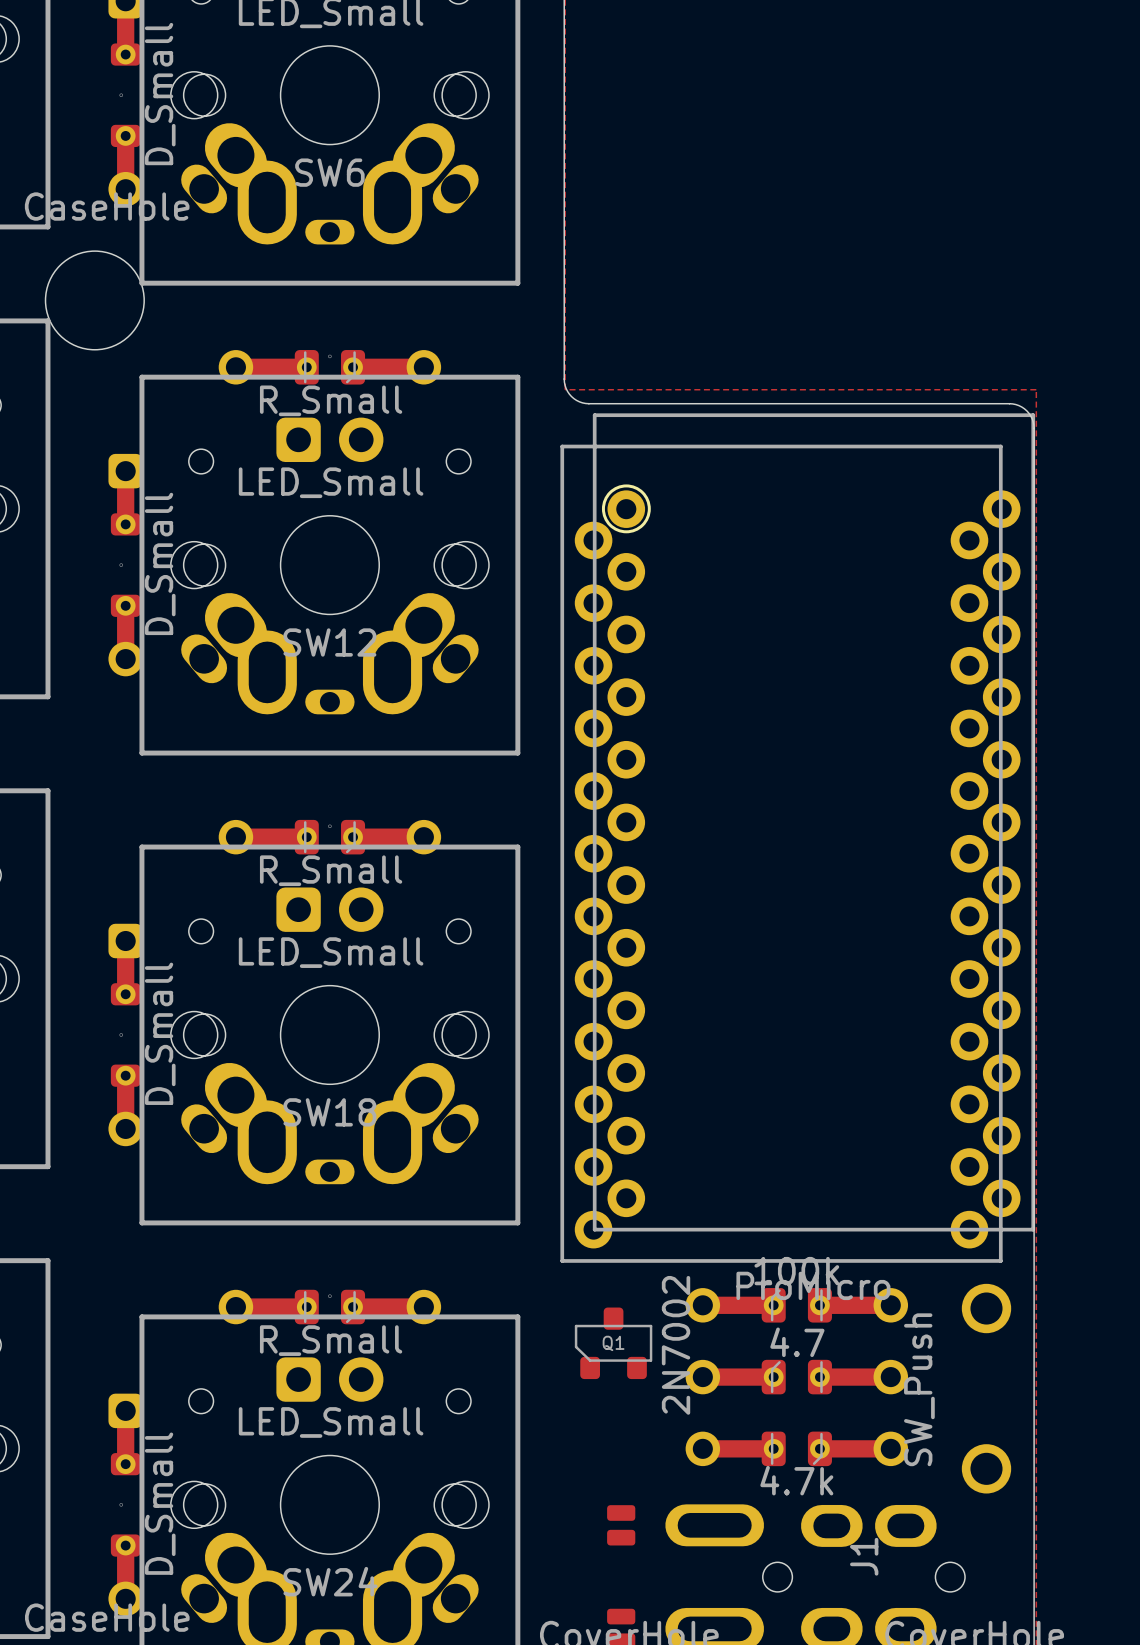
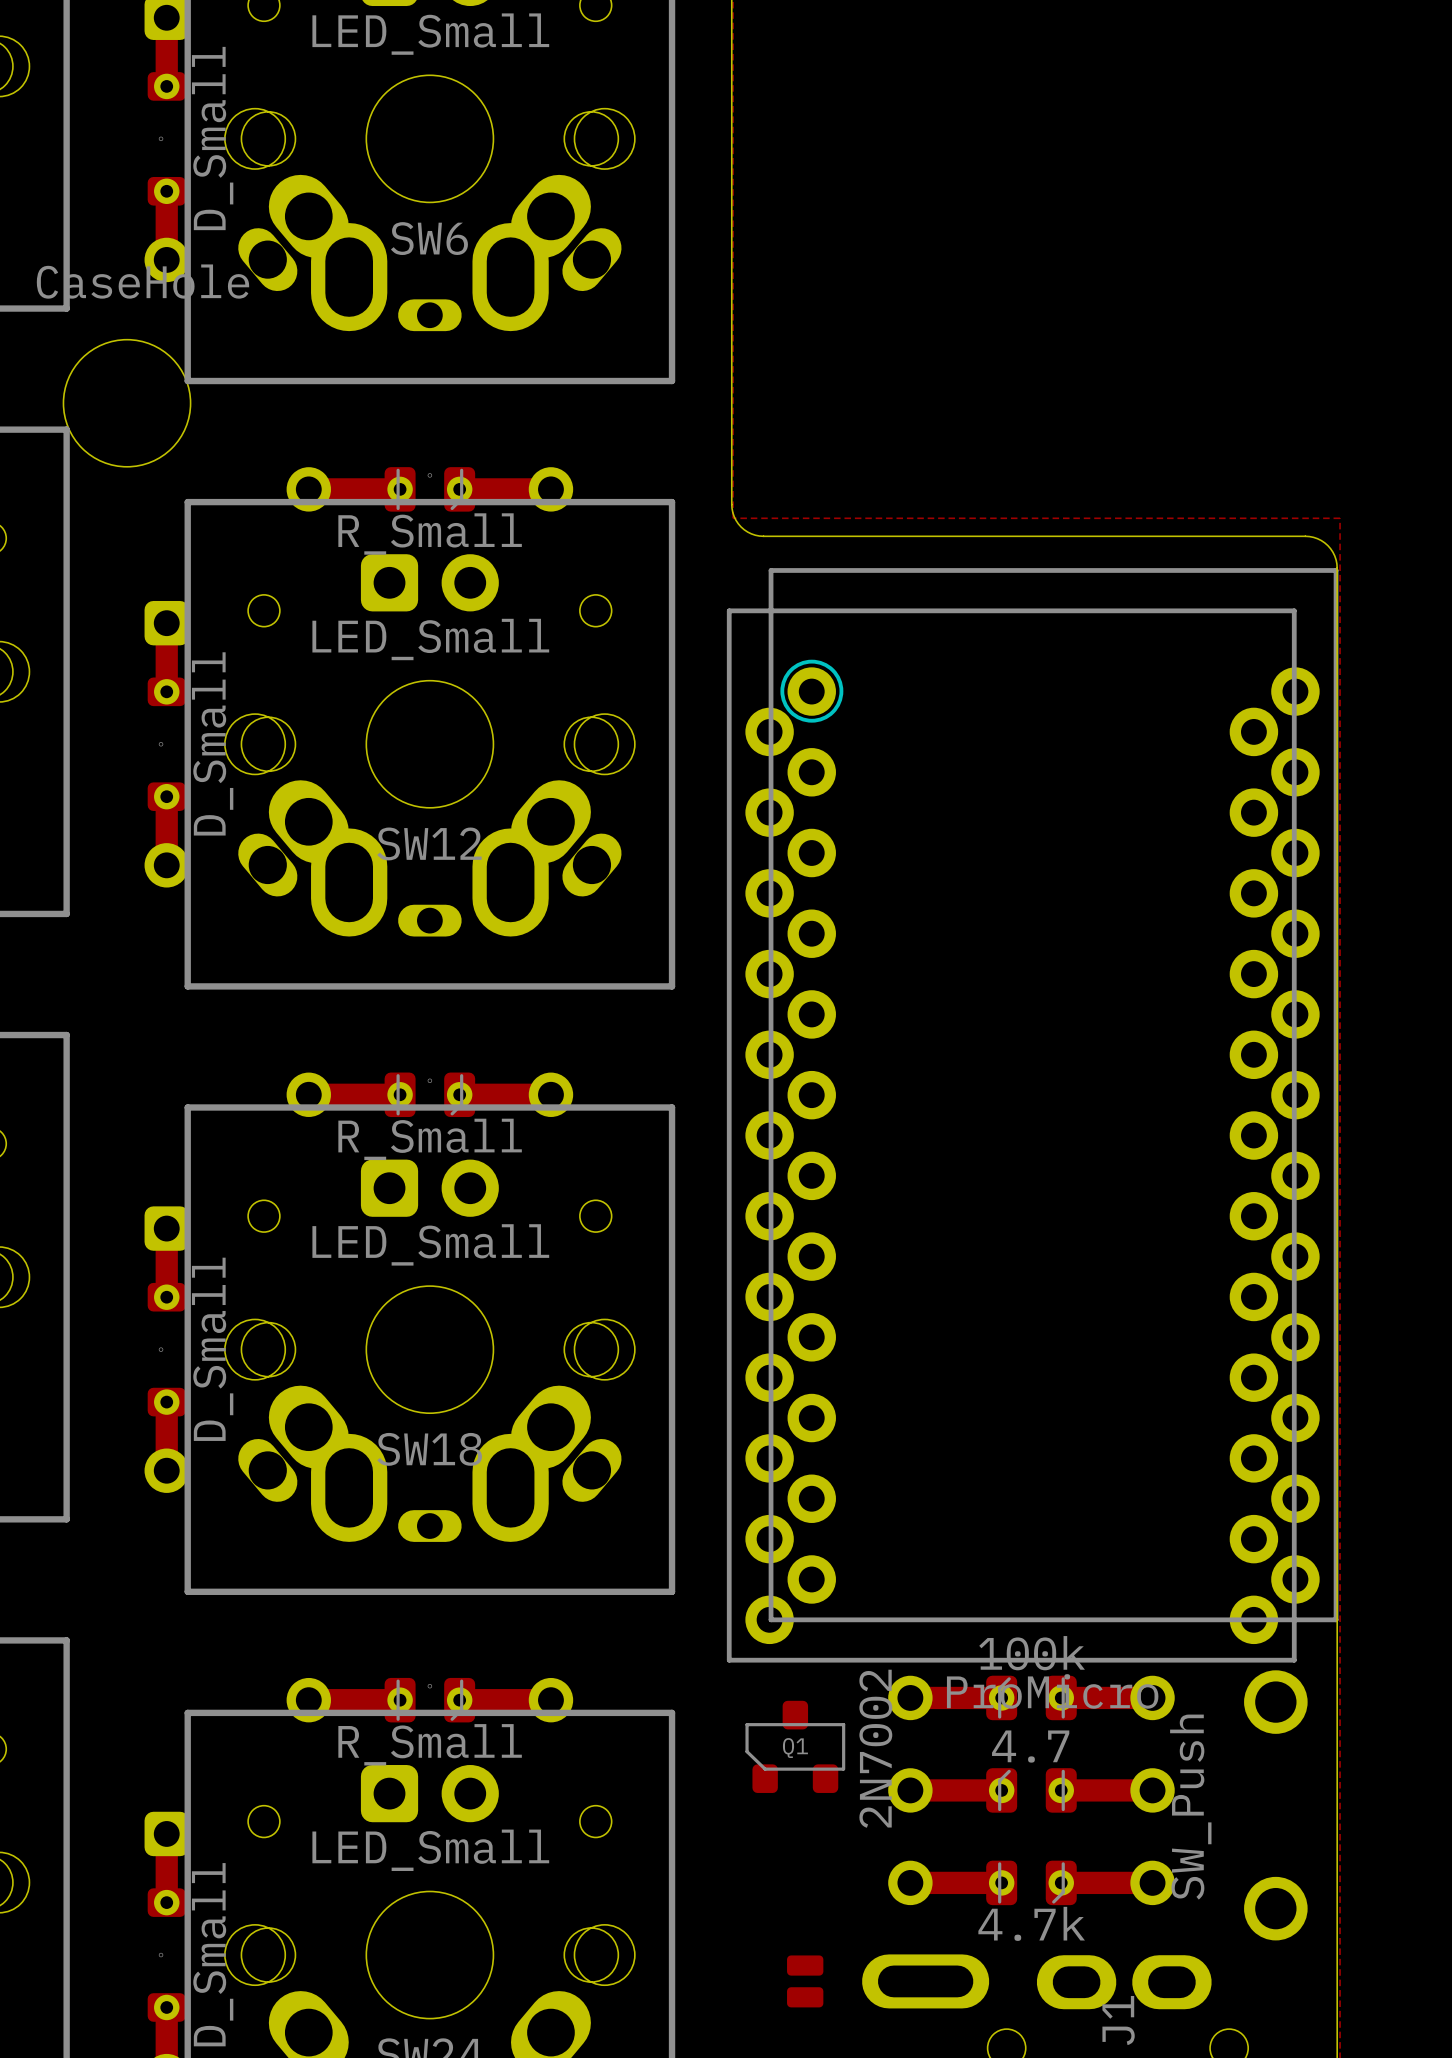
part position: (797, 838) -> (1032, 1115)

